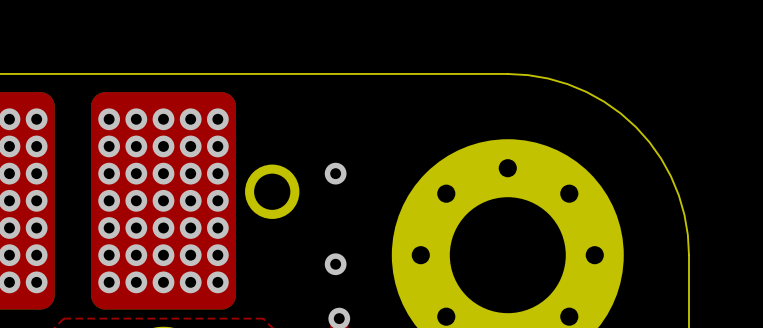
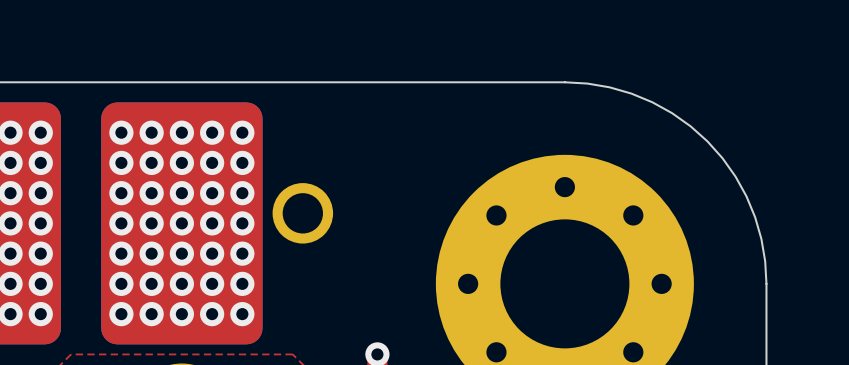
via: (335, 173) -> none
via: (335, 264) -> none

